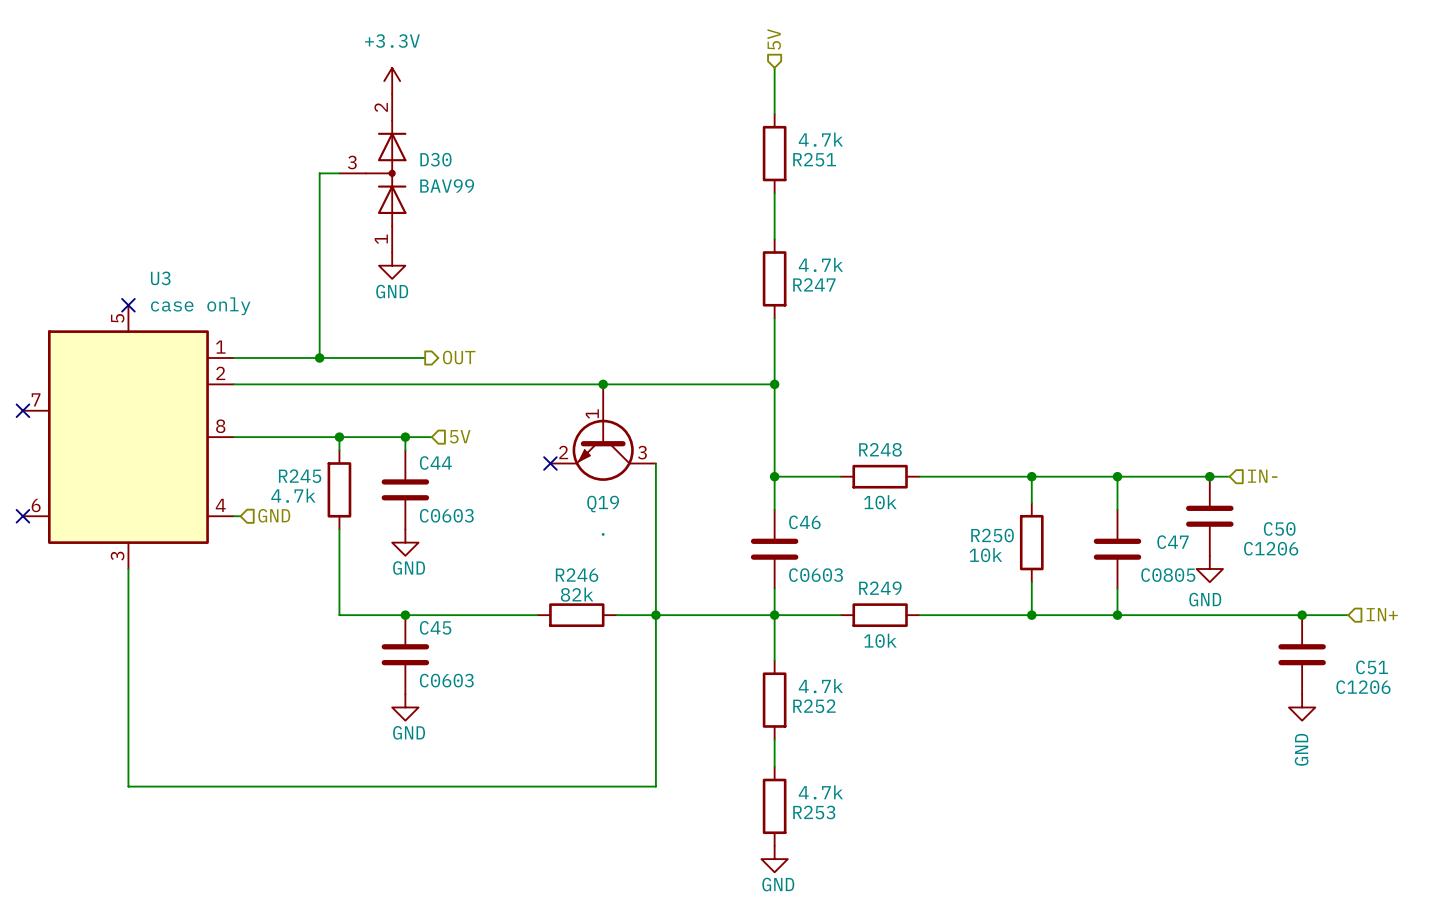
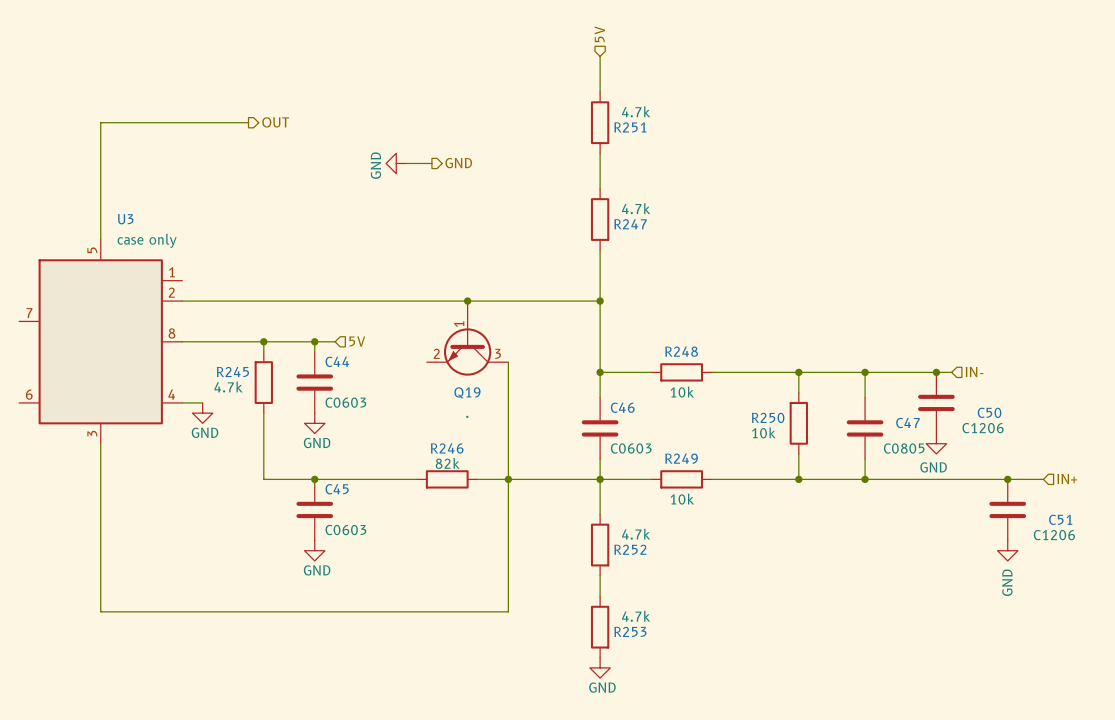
power symbol: +3.3V (392, 81) -> none
wire: none -> (248, 122) (100, 122) (100, 239)
wire: (339, 173) (319, 173) (319, 358) -> none
D30: BAV99 (372, 173) -> none
hierarchical label: none -> GND (458, 163)
wire: none -> (406, 163) (431, 163)
power symbol rotation: 0° (392, 265) -> 90° clockwise (396, 163)
power symbol position: GND (392, 265) -> GND (396, 163)
no-connect mark: (128, 305) -> none
hierarchical label position: OUT (459, 357) -> OUT (275, 122)
wire: (233, 358) (425, 358) -> none
junction: (319, 358) -> none
no-connect mark: (22, 410) -> none
no-connect mark: (550, 463) -> none
hierarchical label: GND (274, 515) -> none
no-connect mark: (22, 516) -> none
wire: none -> (187, 402) (202, 402)
power symbol: none -> GND (202, 413)

